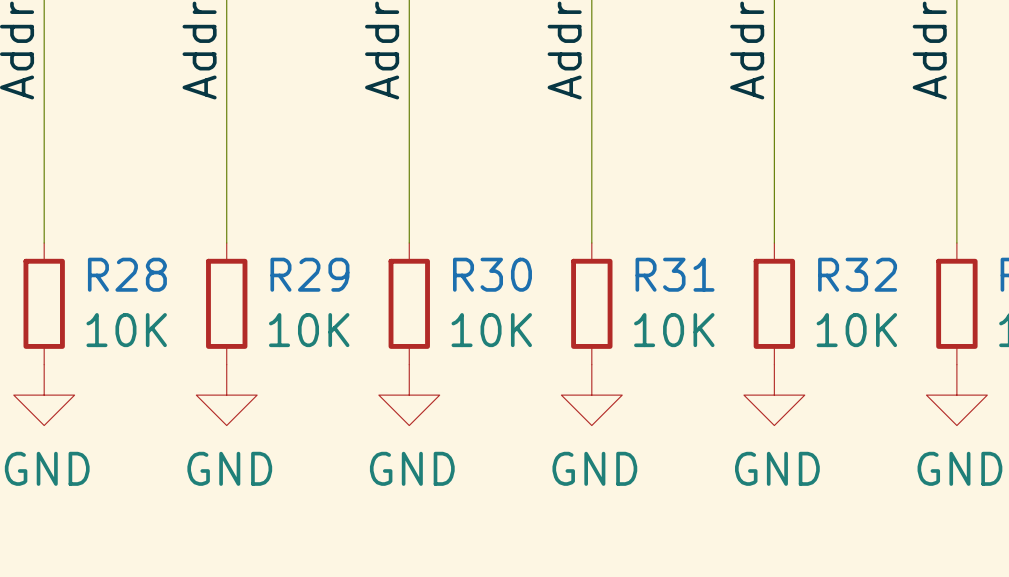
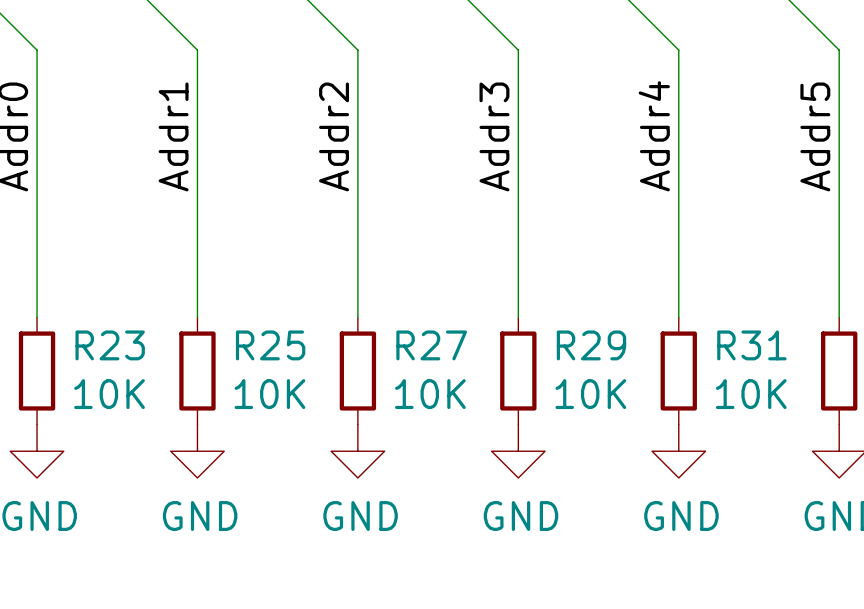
R28 name: R28 (127, 274) -> R23 (110, 345)
R29 name: R29 (309, 274) -> R25 (270, 345)
R30 name: R30 (492, 274) -> R27 (431, 345)
R31 name: R31 (675, 274) -> R29 (591, 345)
R32 name: R32 (857, 274) -> R31 (751, 345)

